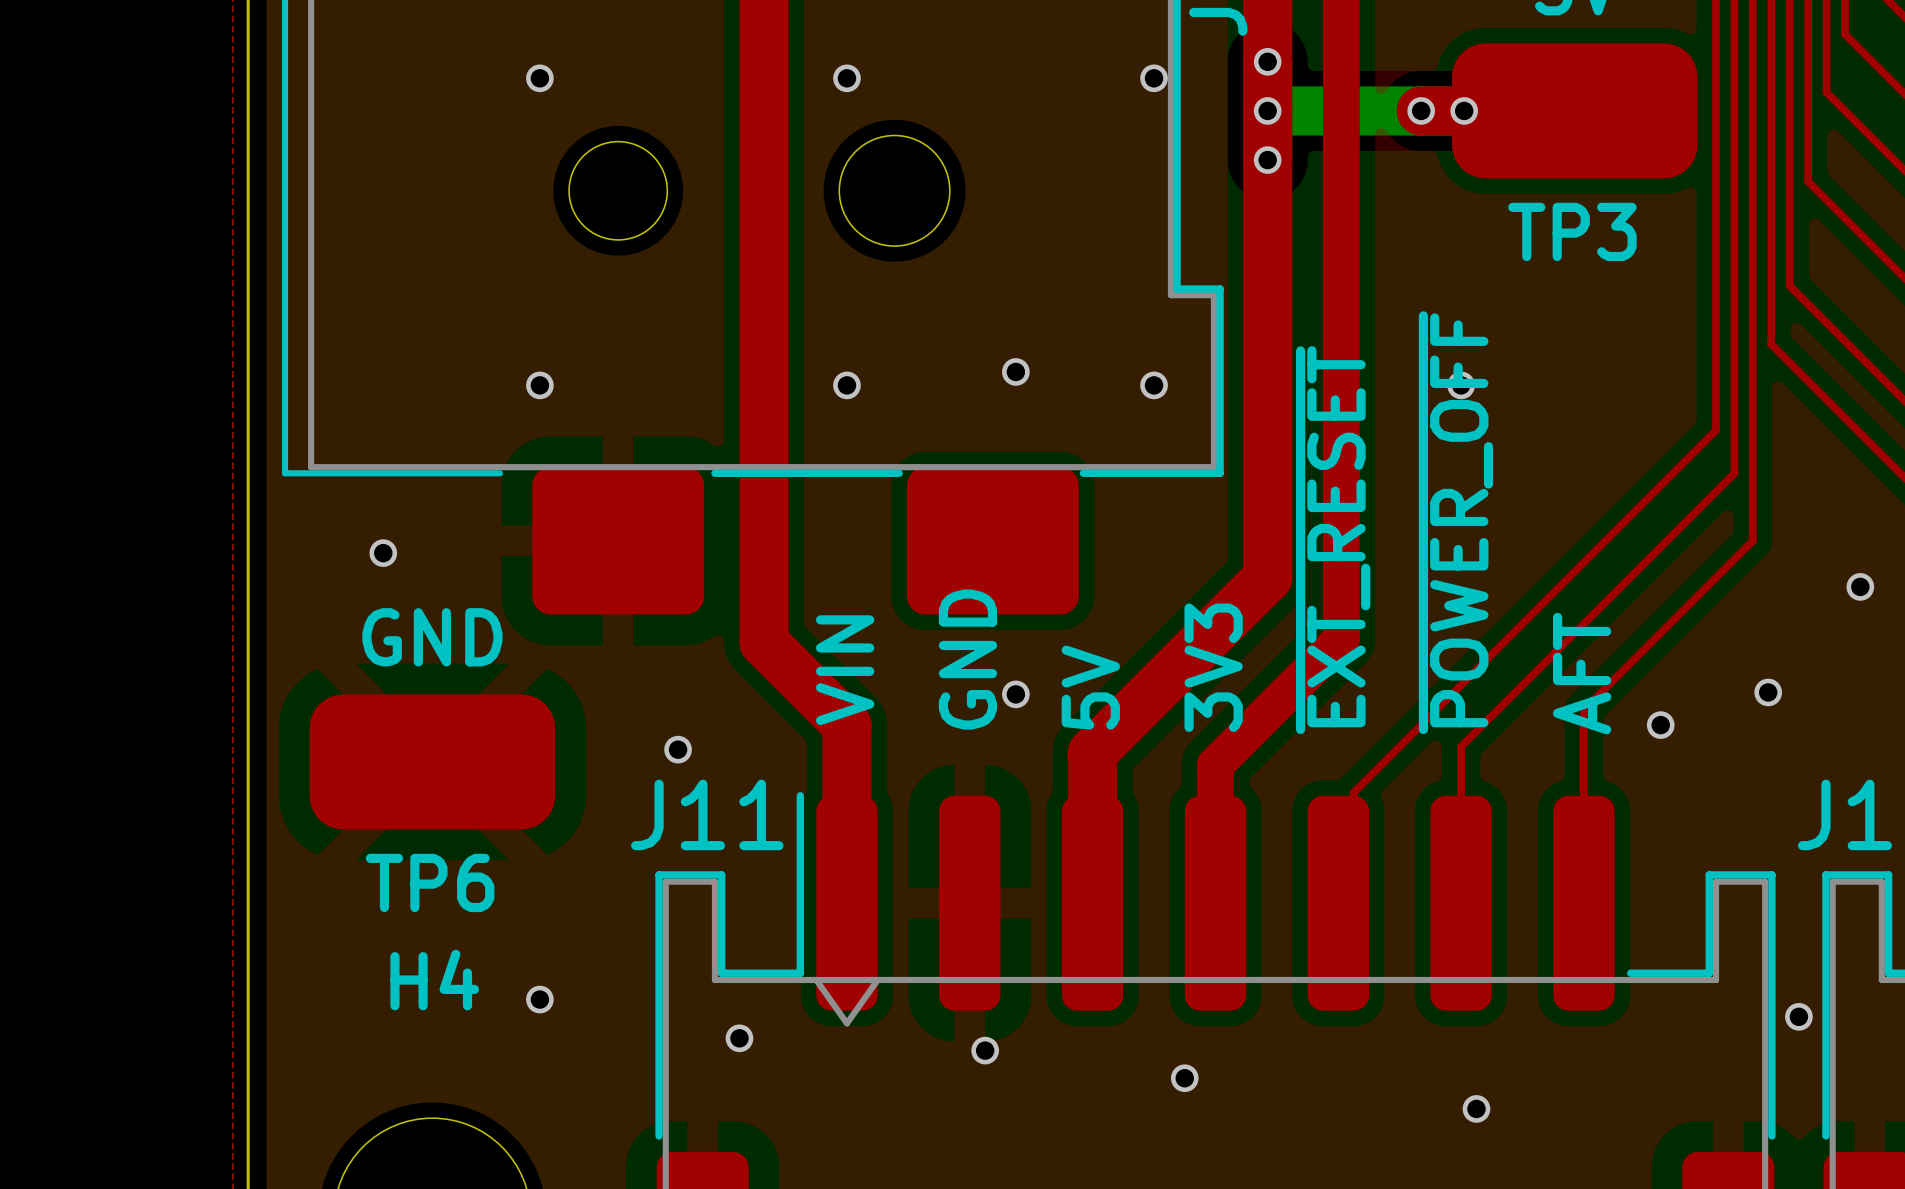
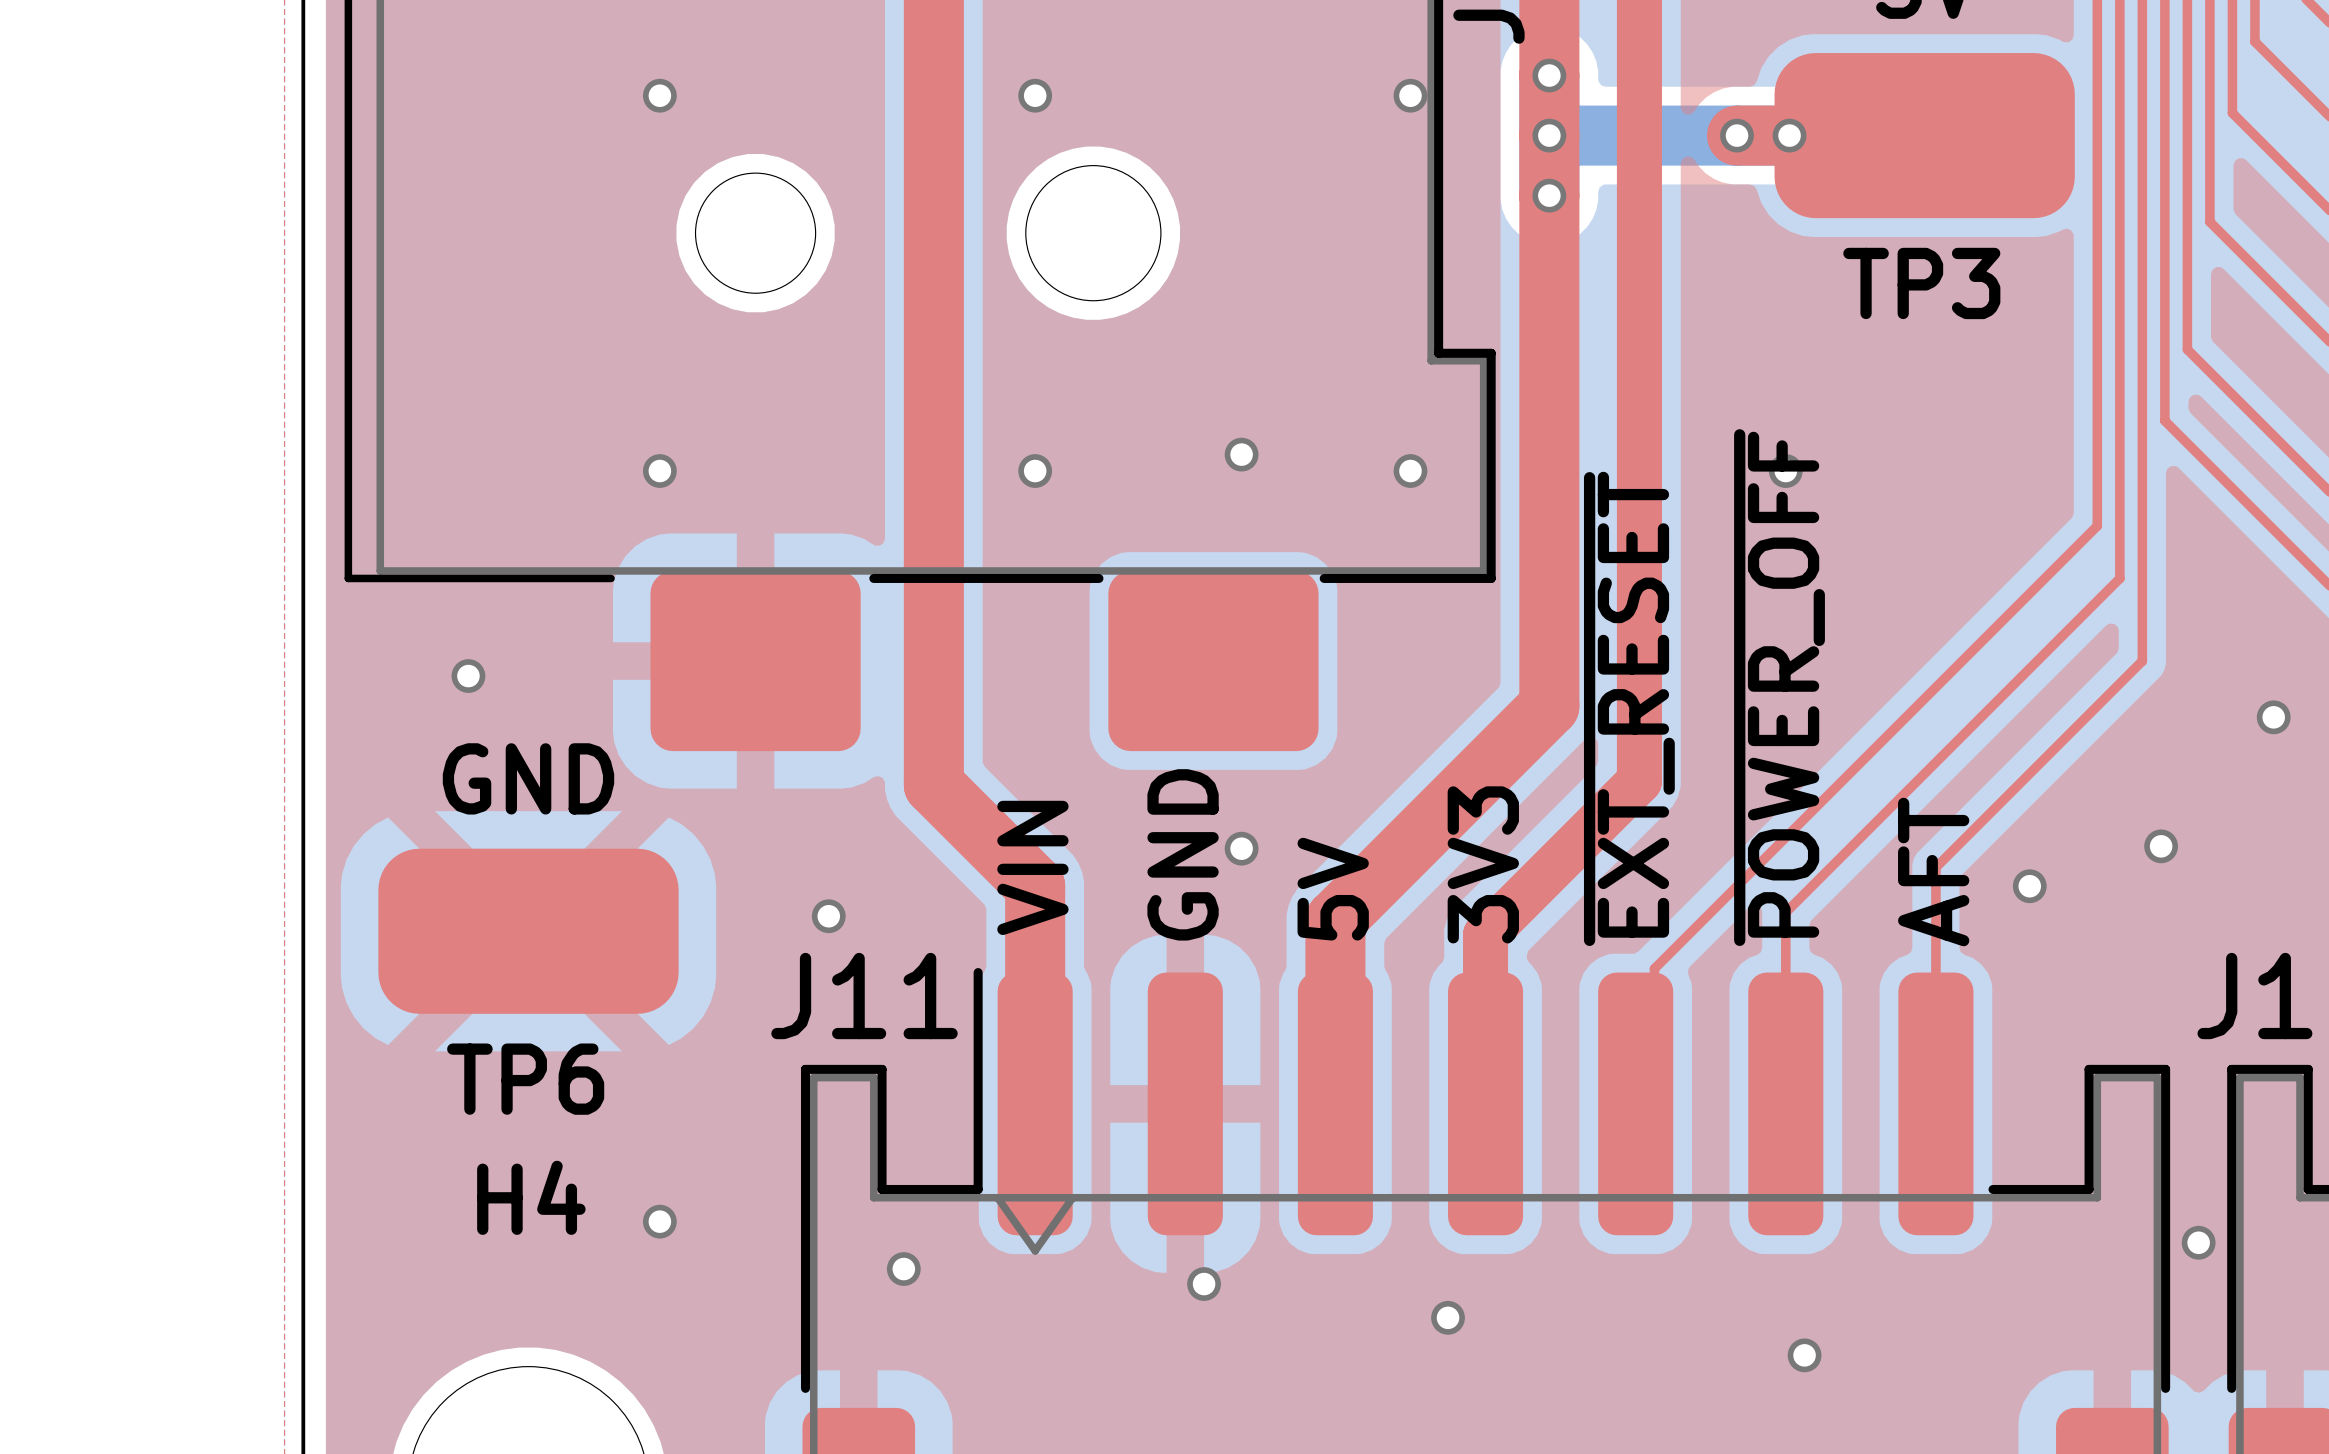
text position: ~{POWER_OFF} (1455, 522) -> ~{POWER_OFF} (1779, 687)
text position: ~{EXT_RESET} (1333, 540) -> ~{EXT_RESET} (1629, 708)
text position: GND (967, 659) -> GND (1183, 854)
text position: 3V3 (1213, 667) -> 3V3 (1483, 864)
text position: VIN (845, 670) -> VIN (1032, 867)
text position: AFT (1582, 673) -> AFT (1933, 872)
text position: 5V (1090, 687) -> 5V (1333, 889)

